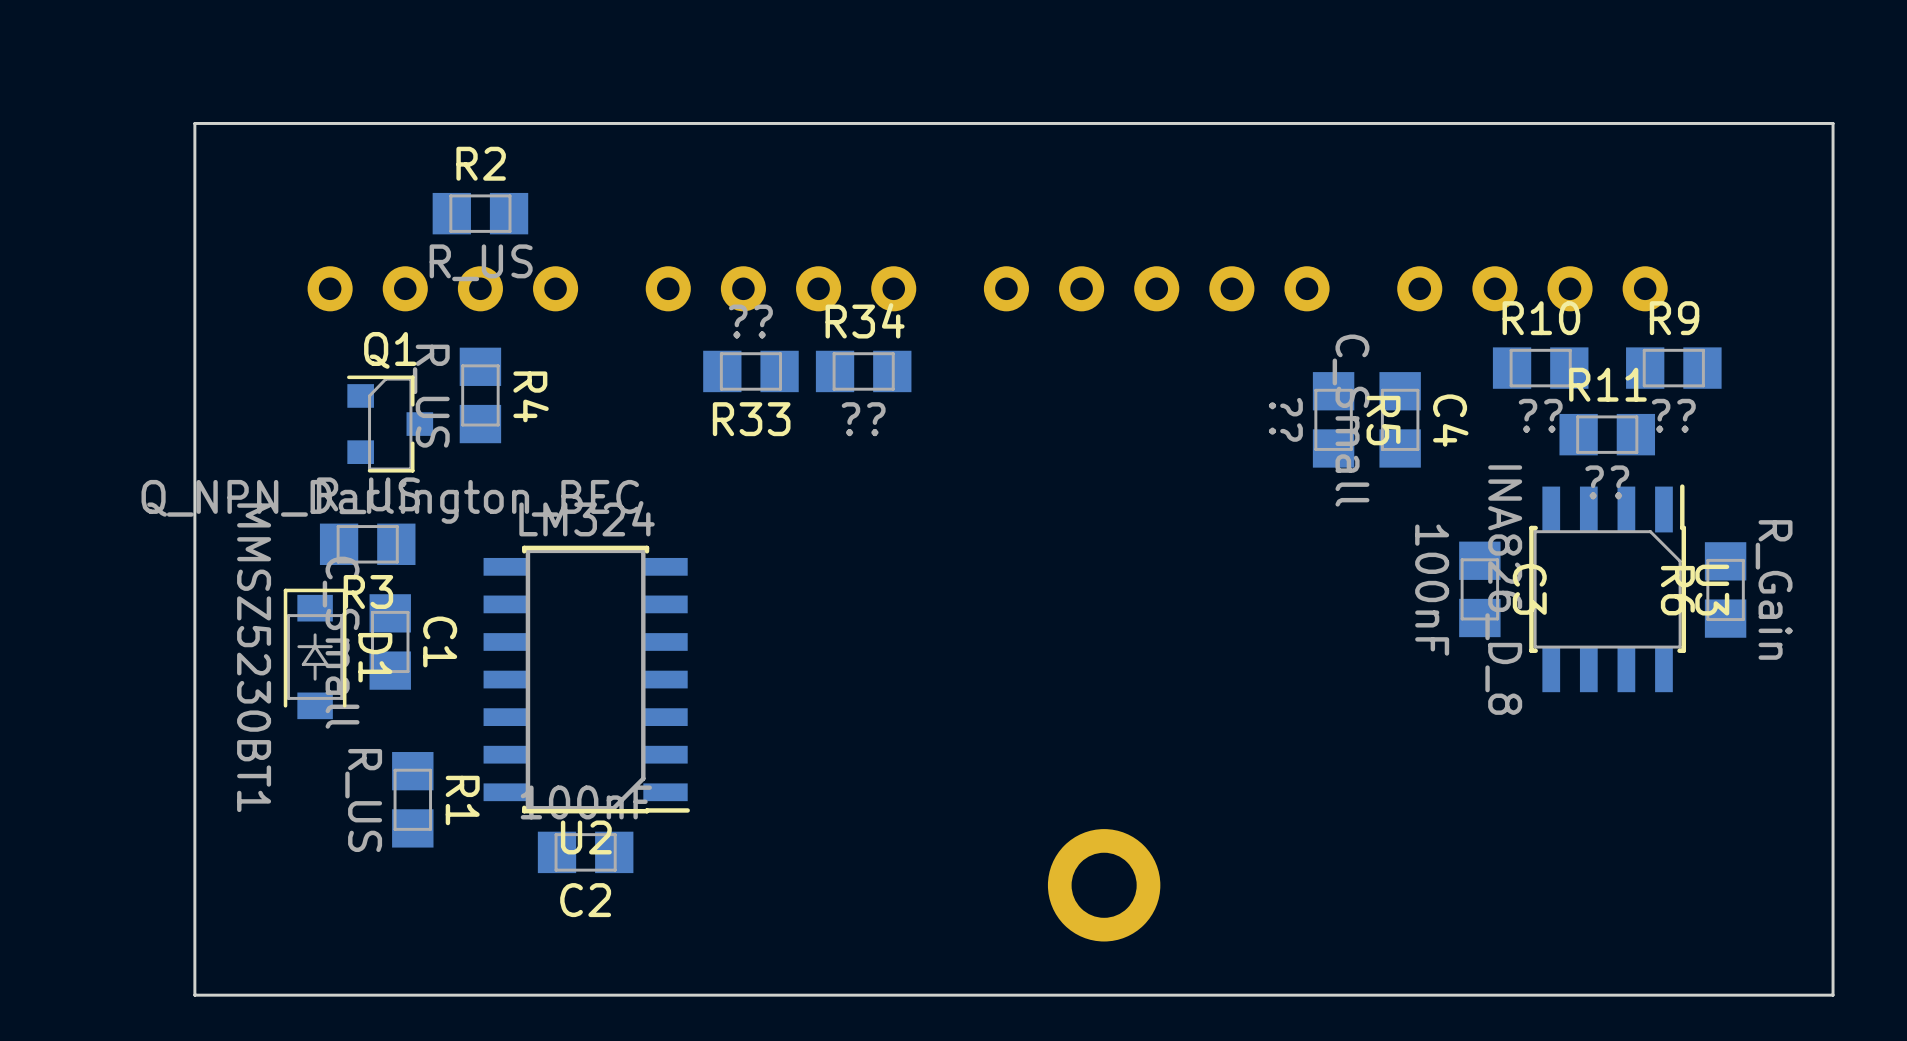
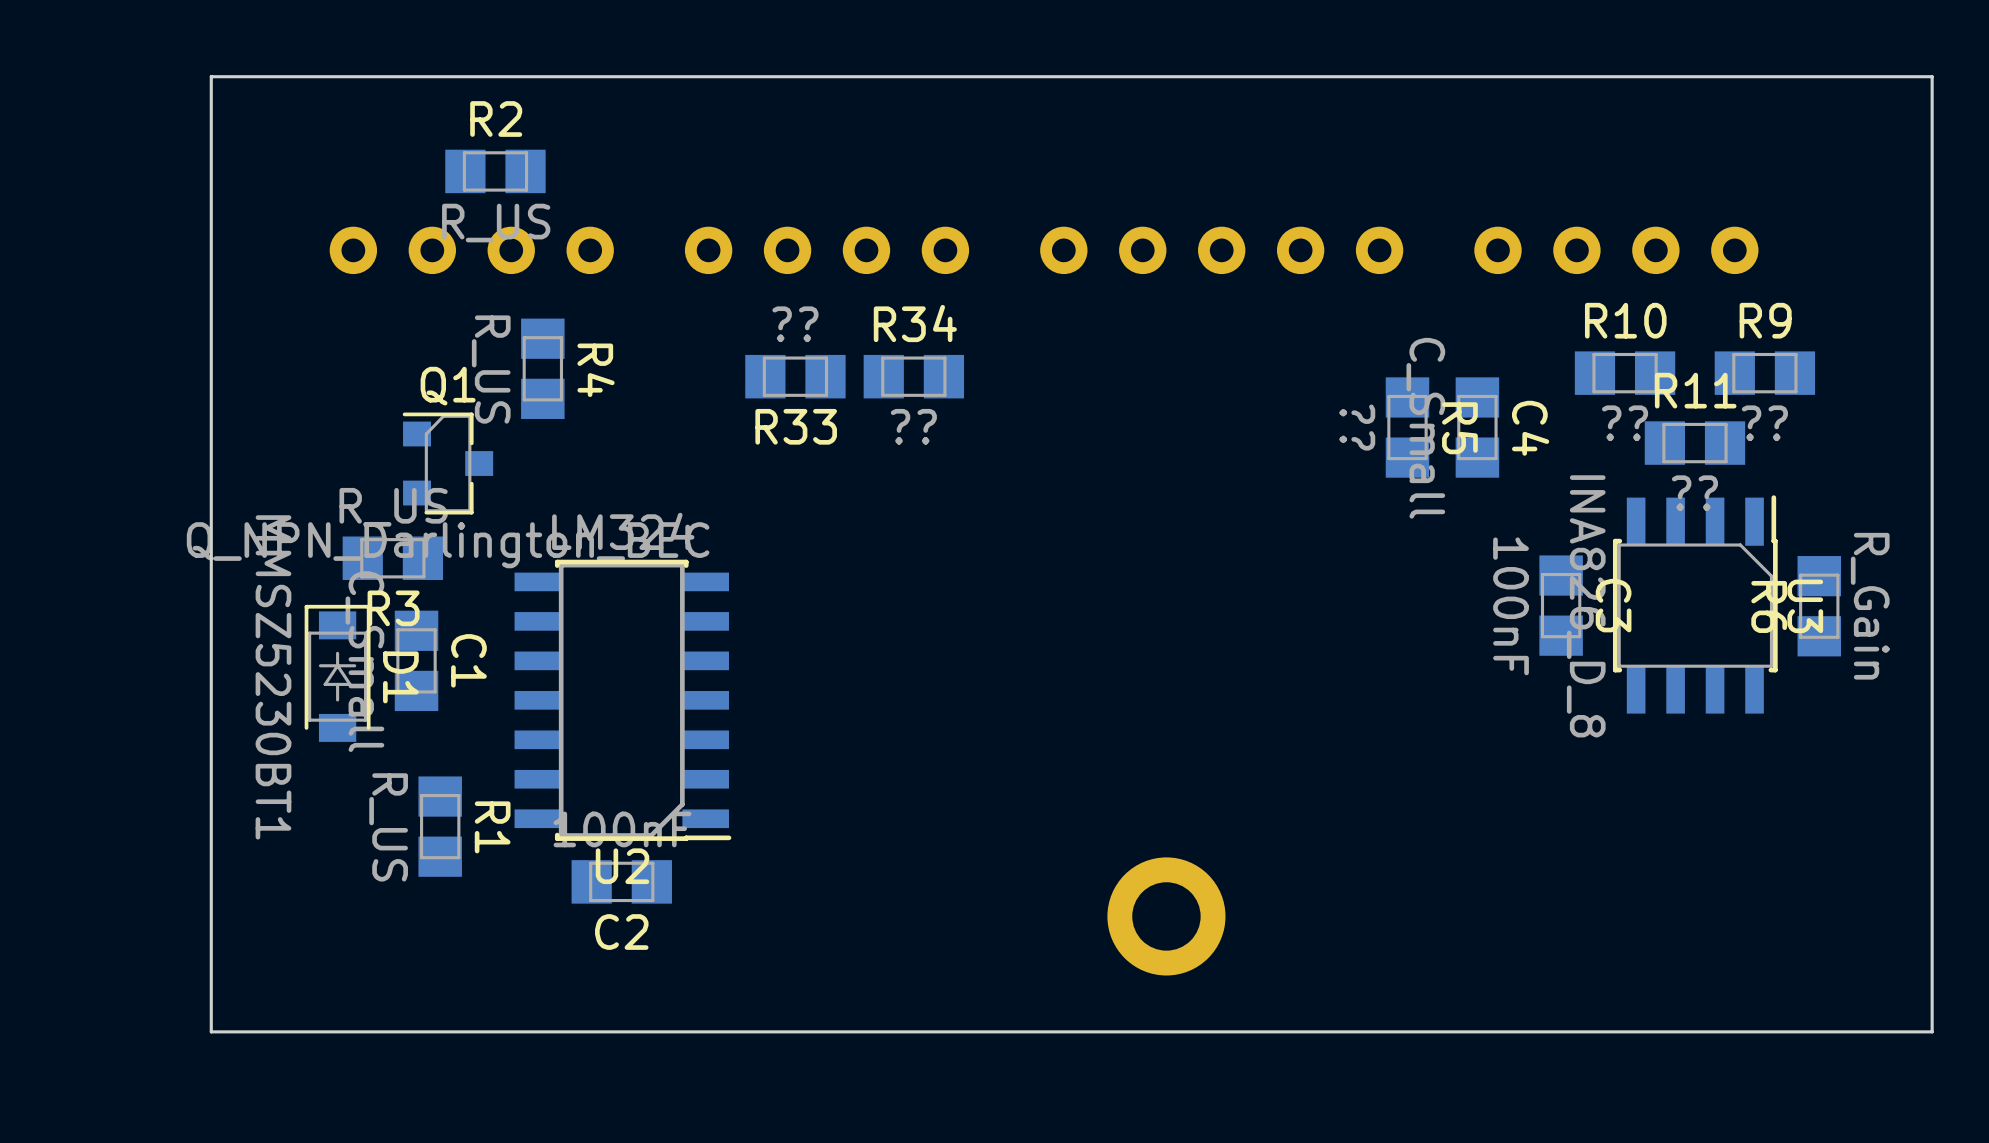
board edge: (1833, 123) (194, 123) -> (1932, 116) (1932, 76) (211, 76) (211, 116)
R2 position: (480, 213) -> (495, 171)
part position: (987, 288) -> (1044, 250)
R4 position: (480, 395) -> (542, 368)
Q1 position: (390, 424) -> (447, 463)

